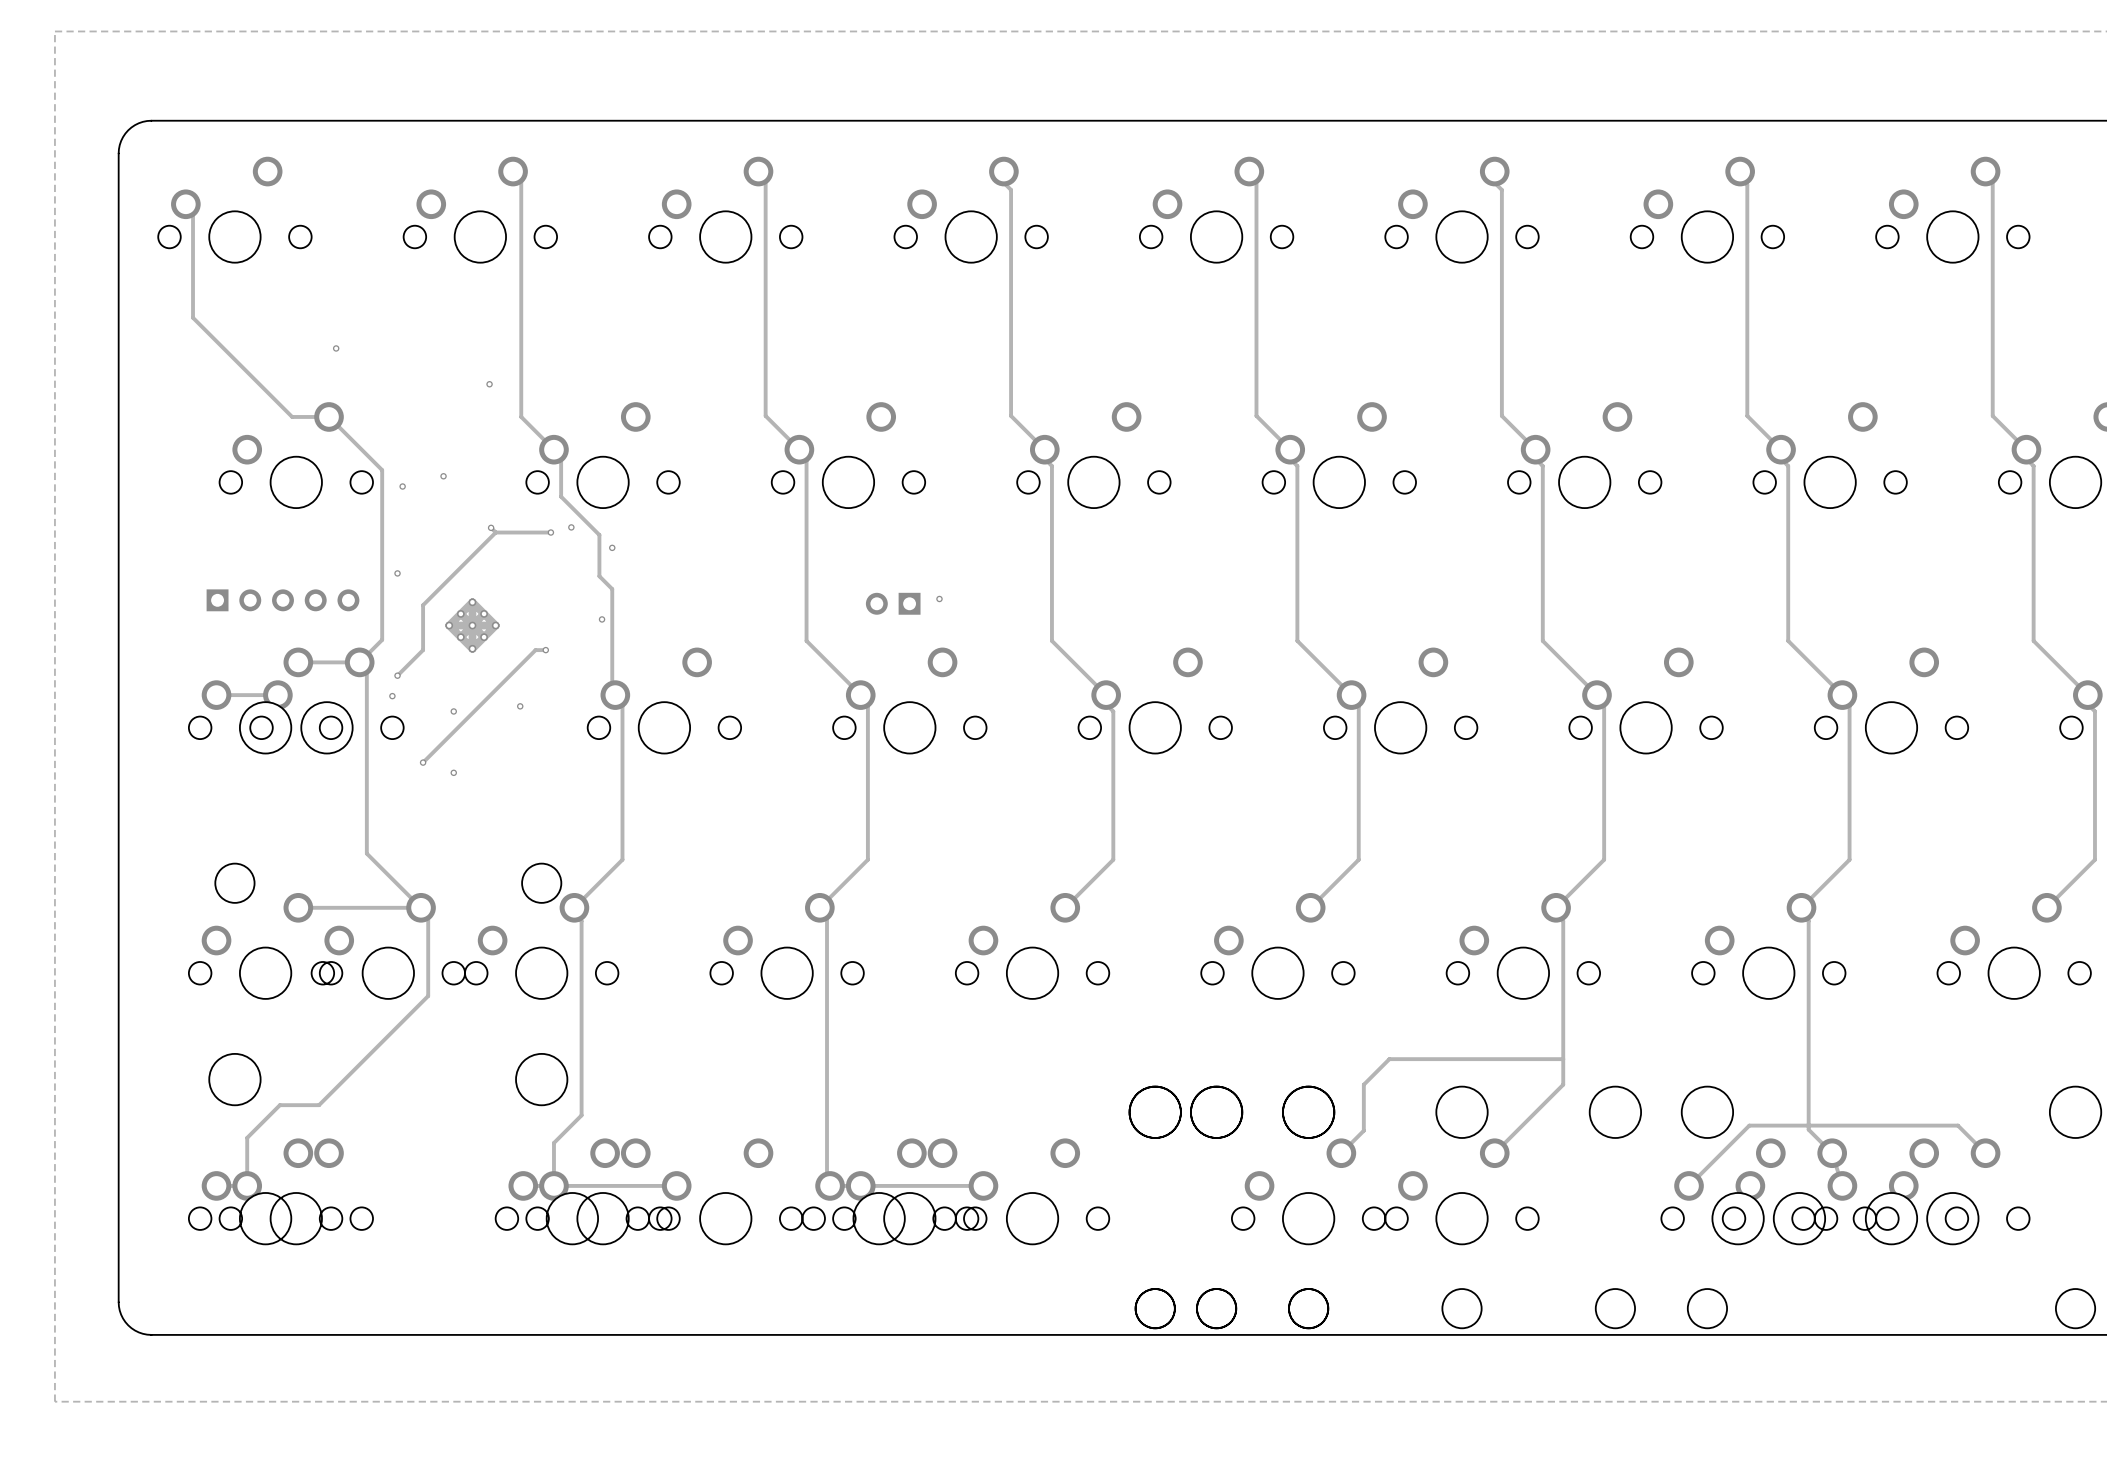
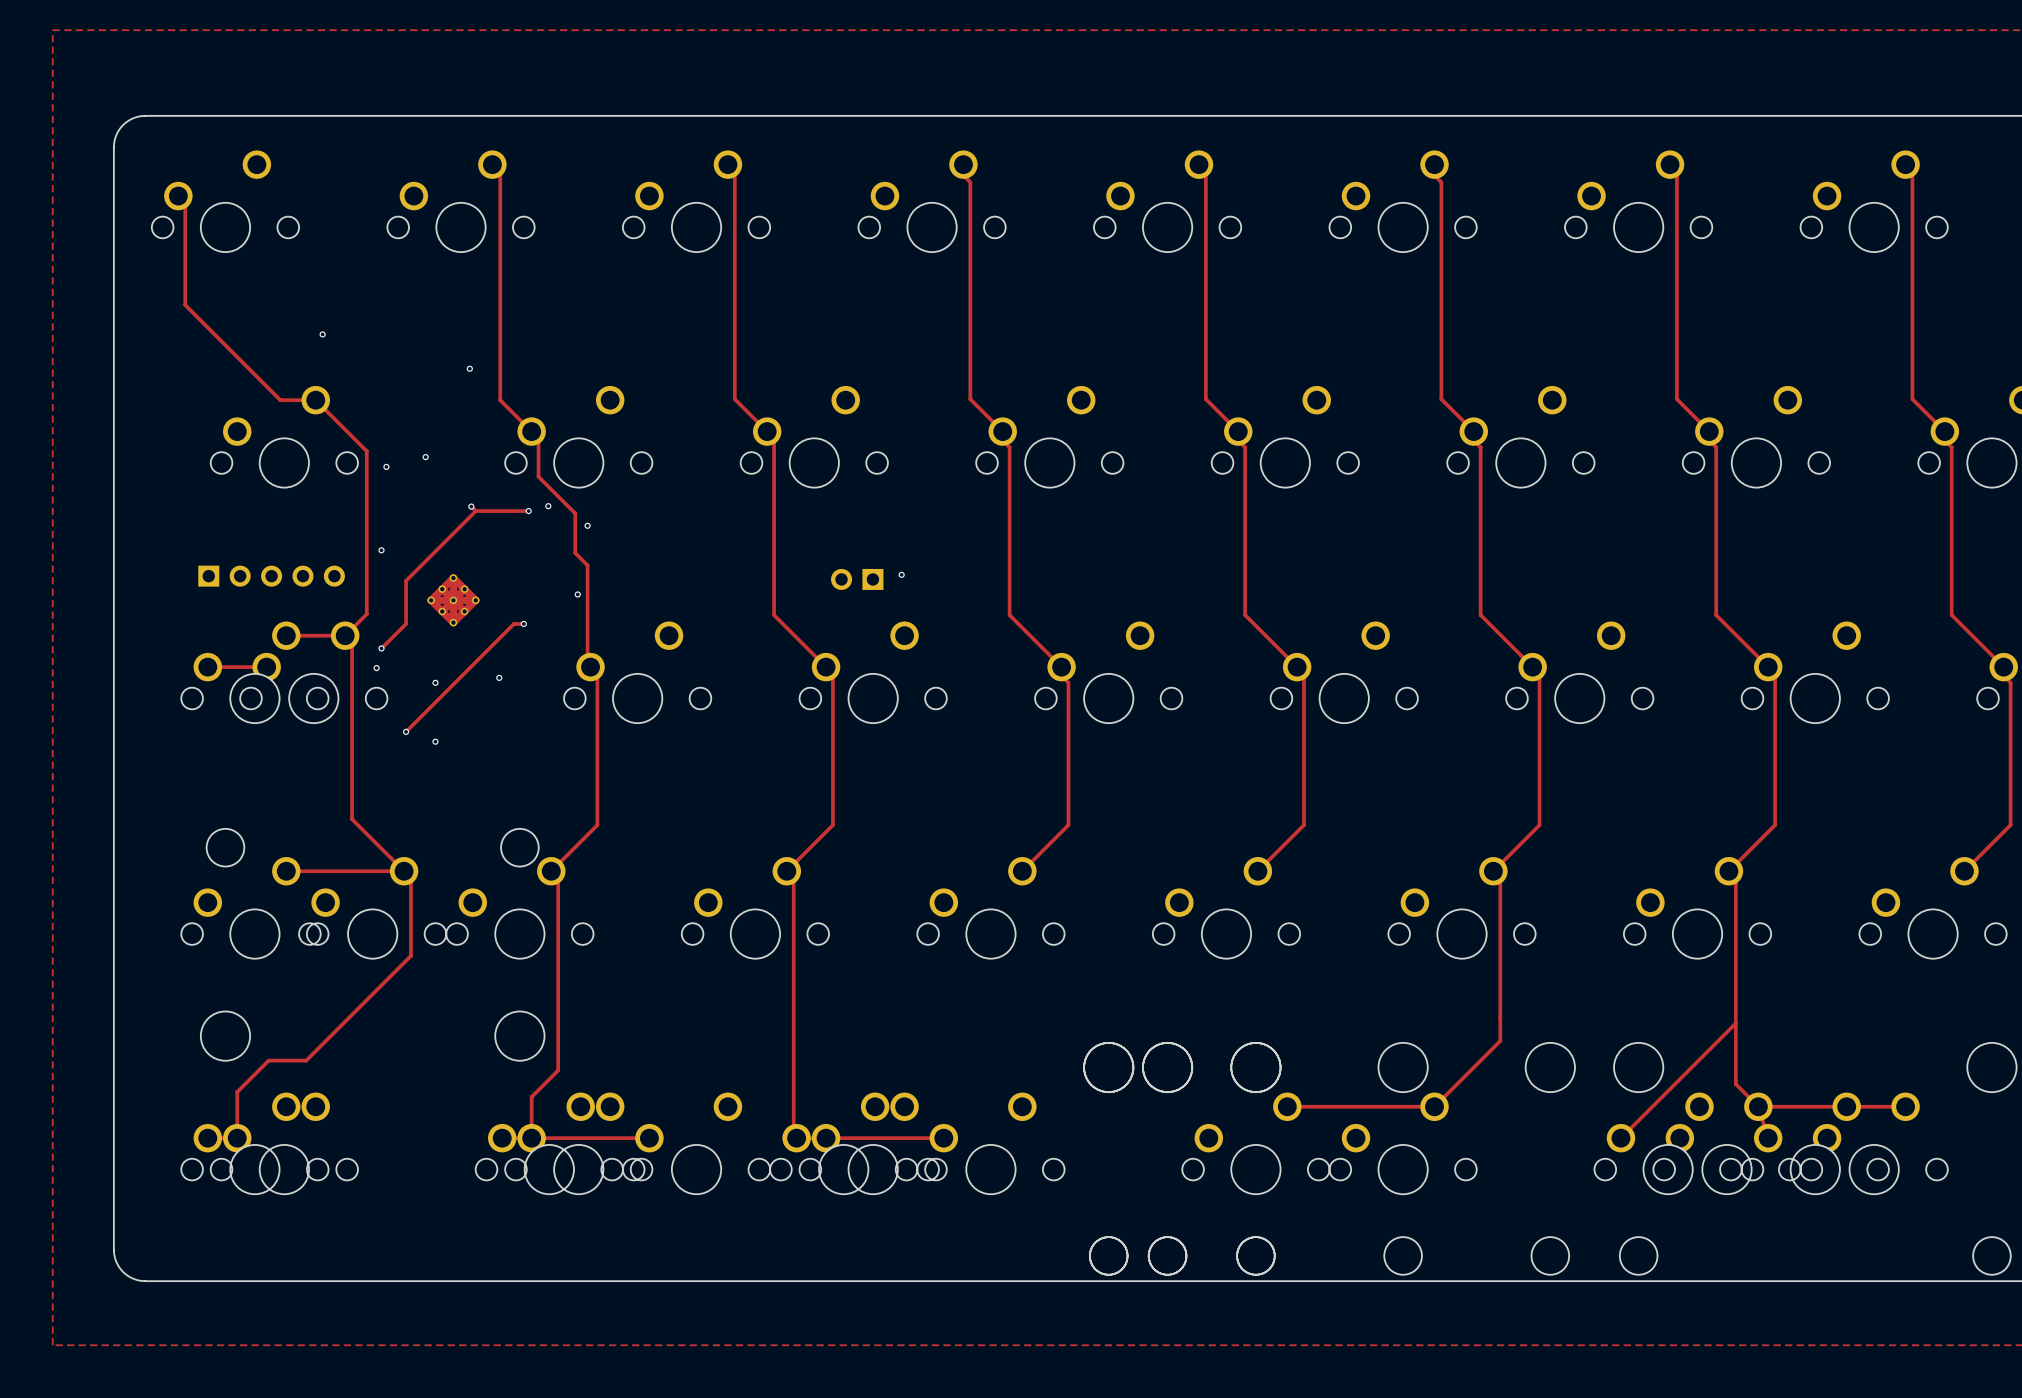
track: (1563, 1059) (1389, 1059) (1363, 1084) (1363, 1130) (1341, 1153) -> (1434, 1106) (1287, 1106)
track: none -> (1735, 1023) (1678, 1080)
track: (1749, 1125) (1957, 1125) (1985, 1153) -> (1762, 1106) (1905, 1106)

